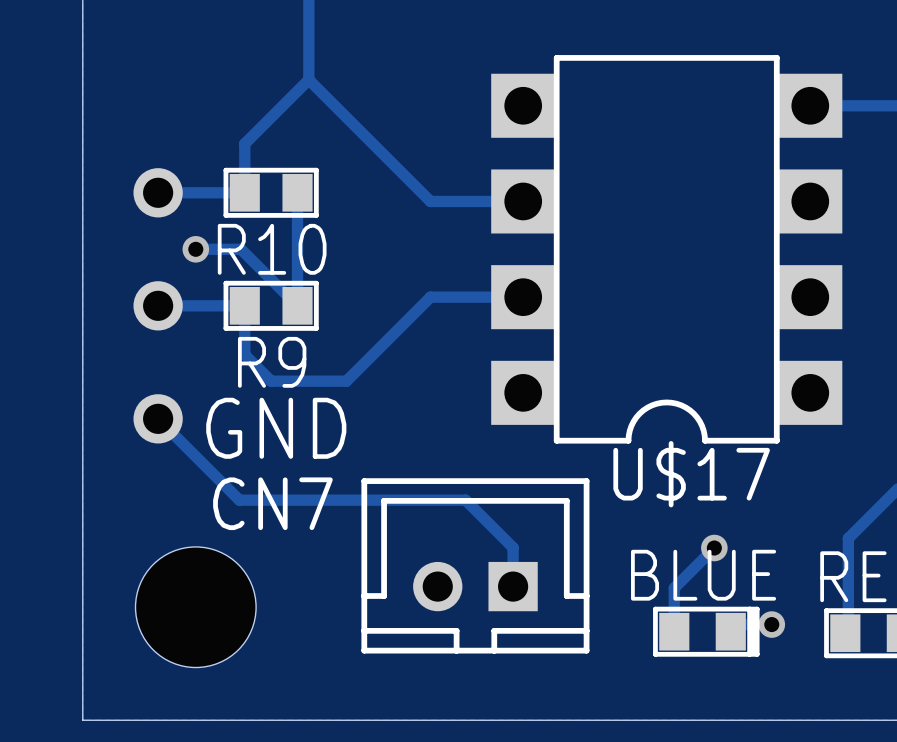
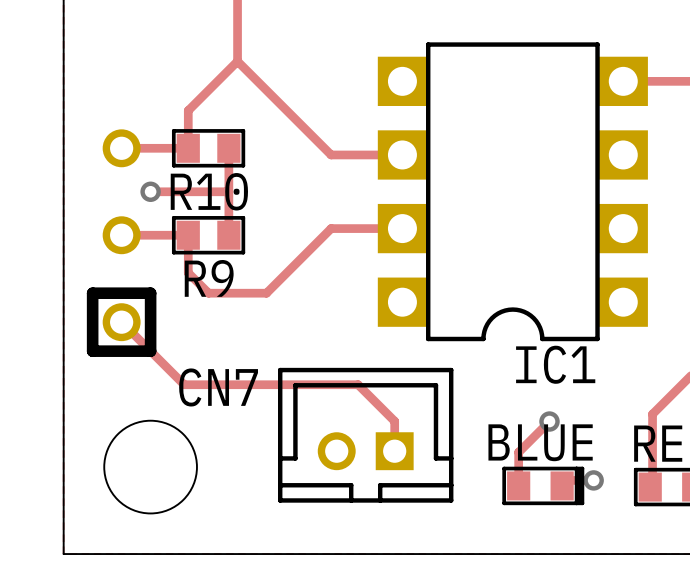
track: (241, 249) (297, 305) -> (185, 191) (228, 191)
line: none -> (92, 293) (150, 293) (150, 351) (92, 351) (92, 293)
text: GND (276, 428) -> none
U$17 name: U$17 (691, 474) -> IC1 (555, 364)

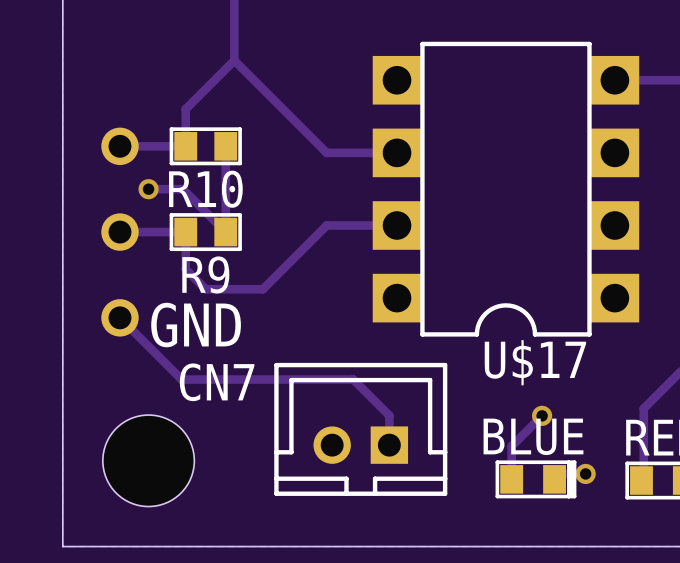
track: (185, 191) (228, 191) -> (182, 189) (225, 232)
line: (92, 293) (150, 293) (150, 351) (92, 351) (92, 293) -> none
text: none -> GND (196, 325)
IC1 name: IC1 (555, 364) -> U$17 (535, 362)

